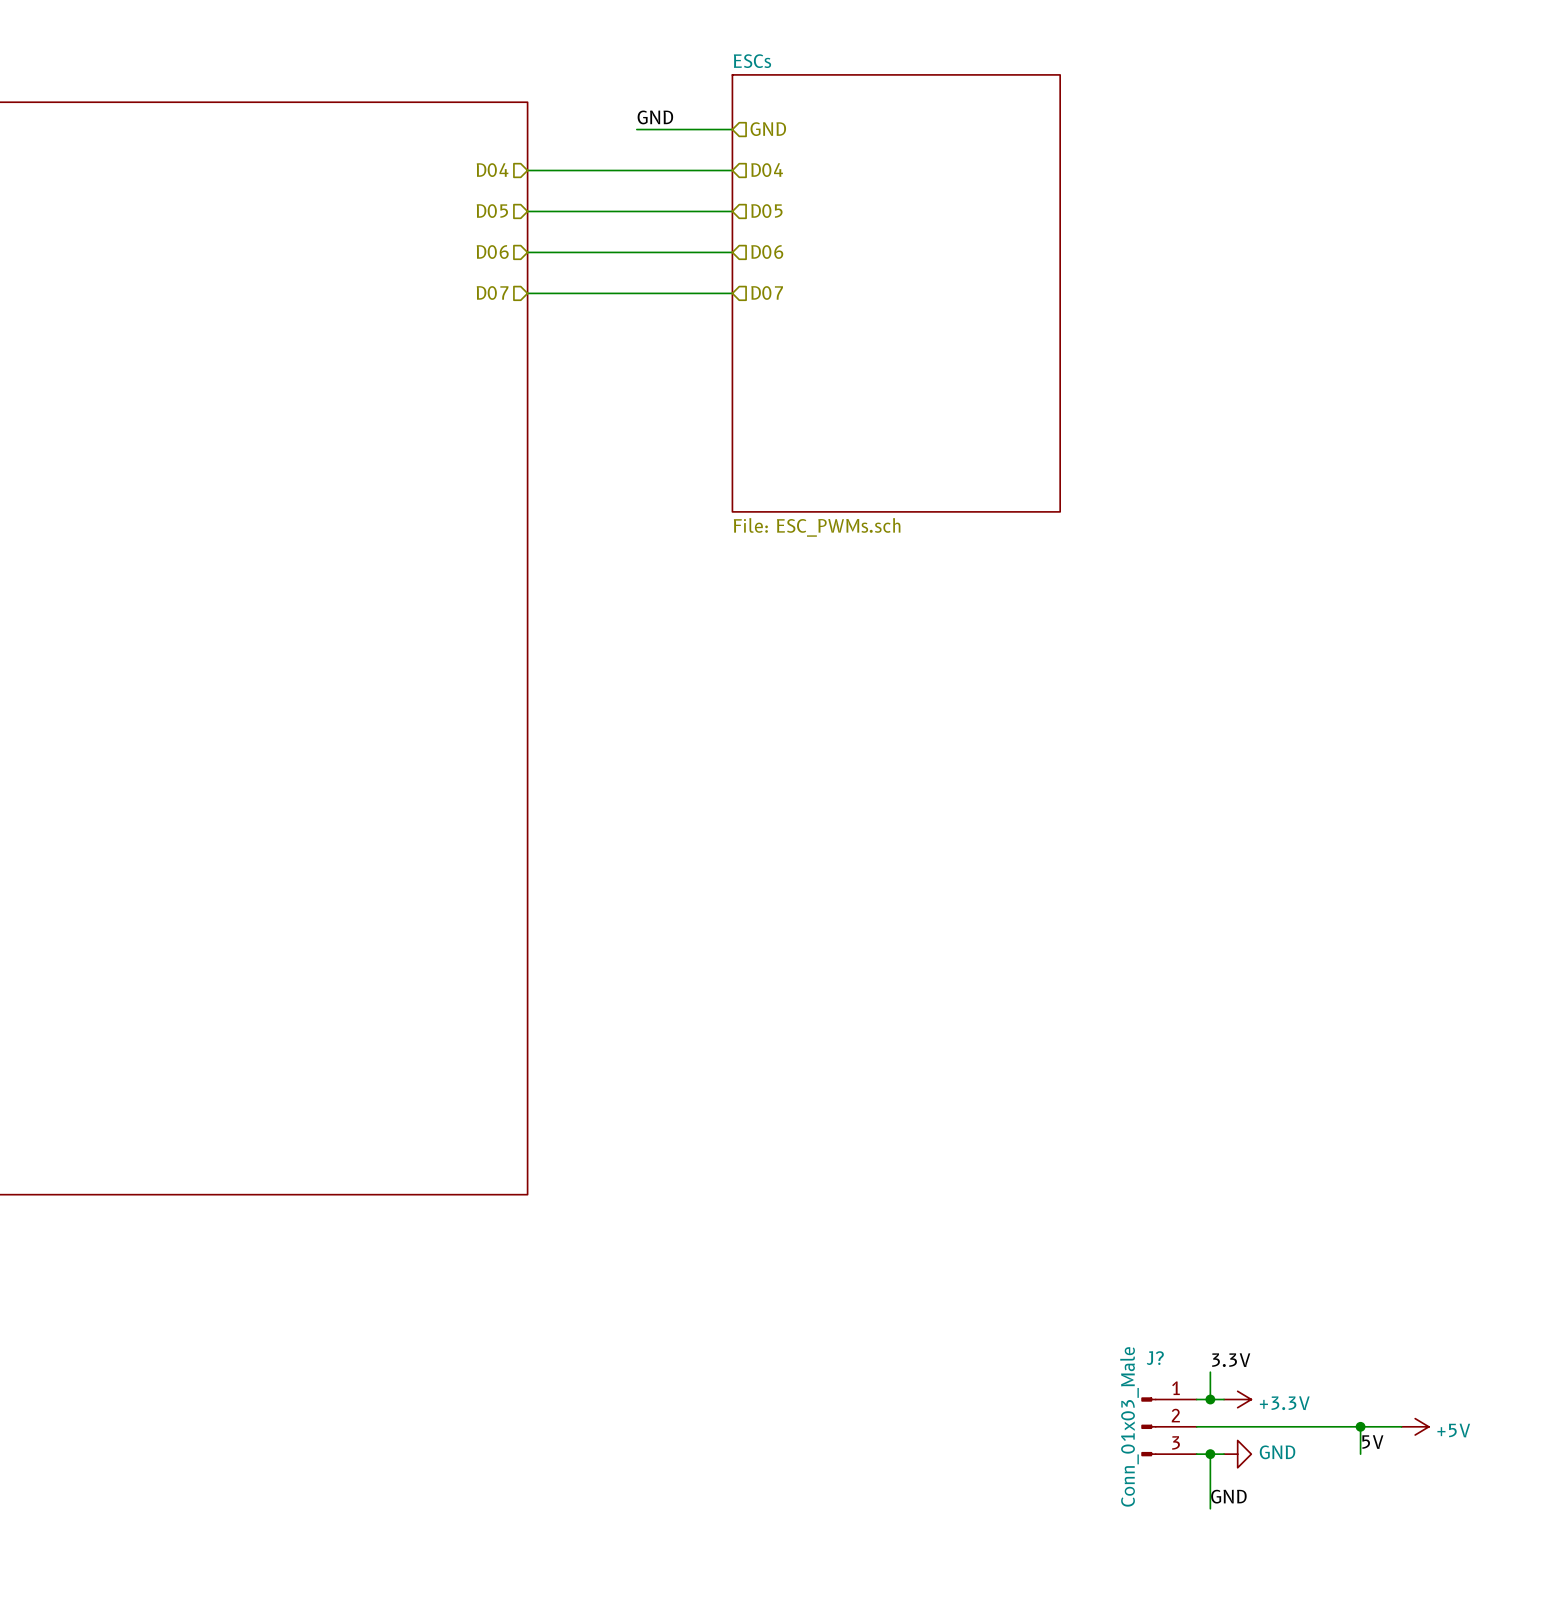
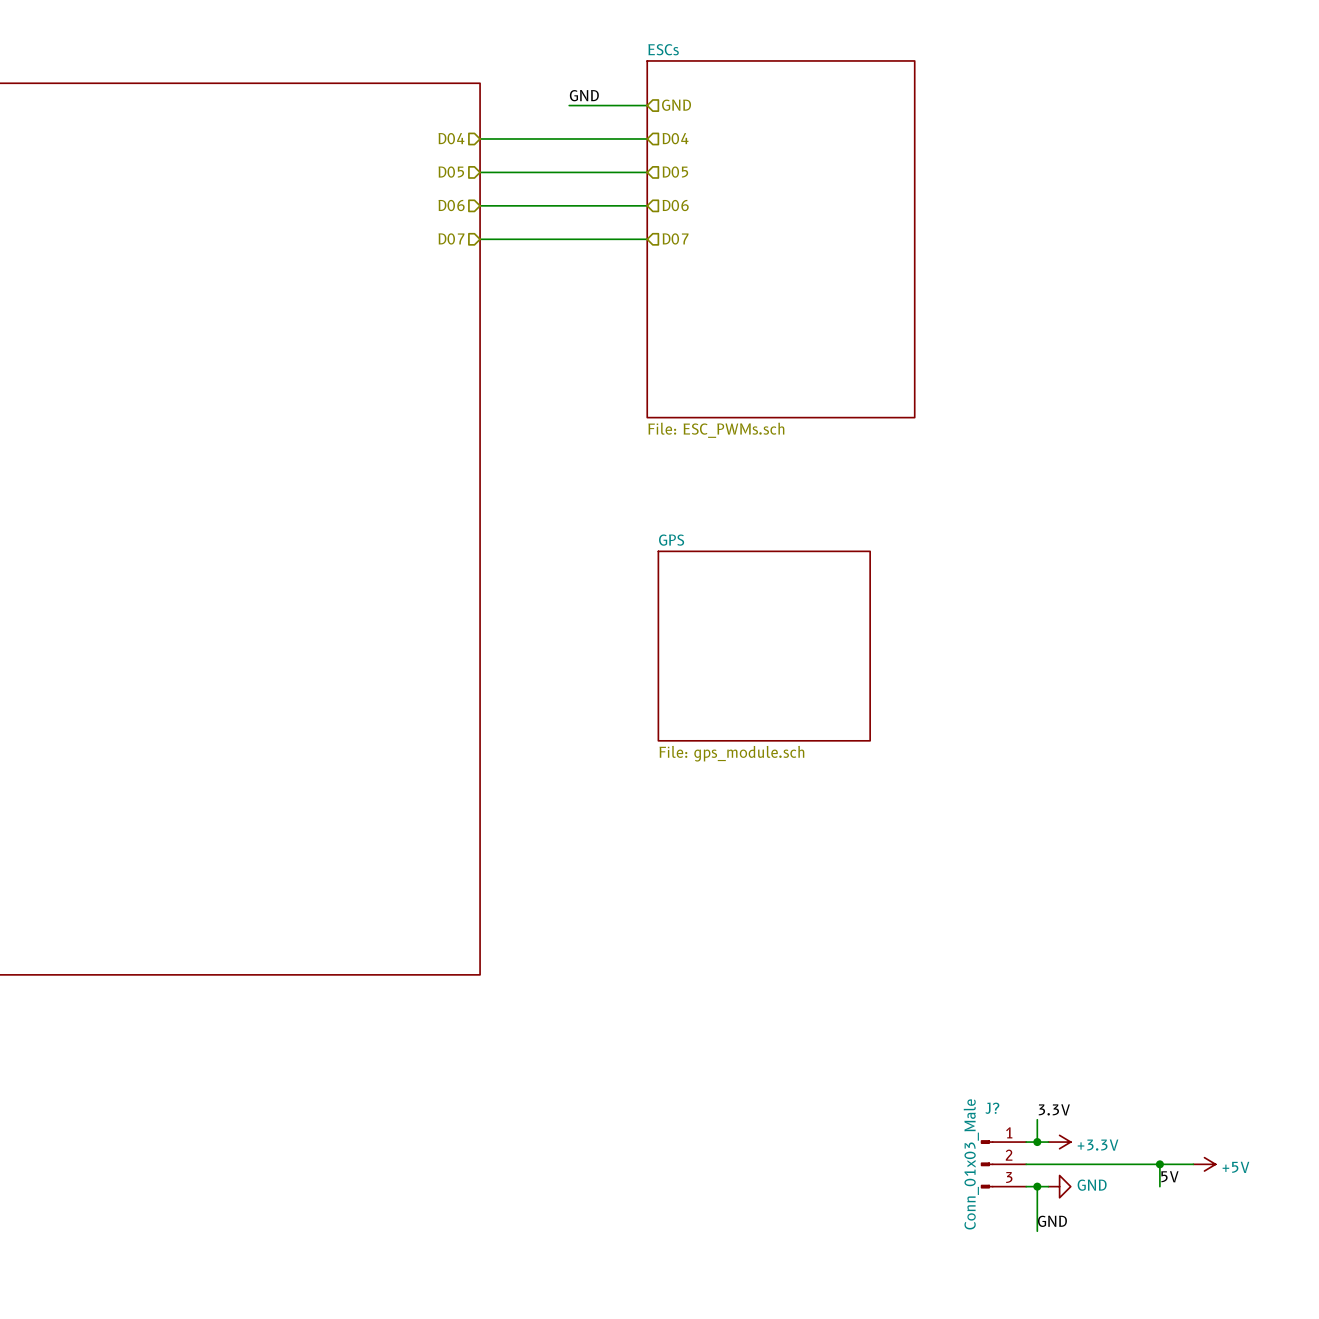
sheet GPS: none -> File: gps_module.sch (764, 646)

